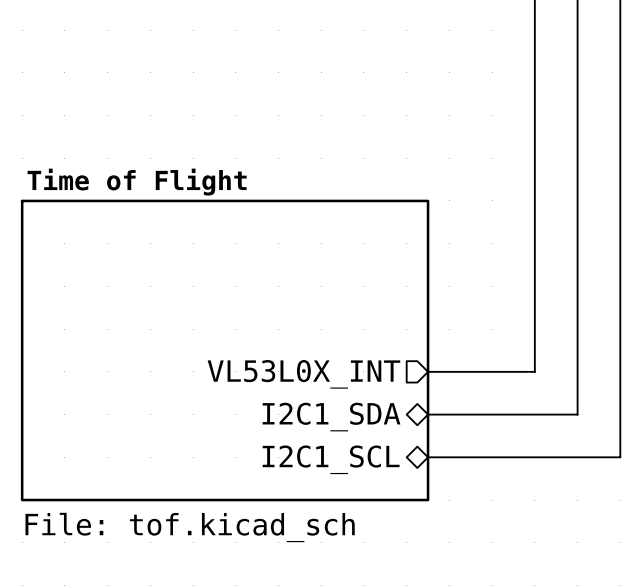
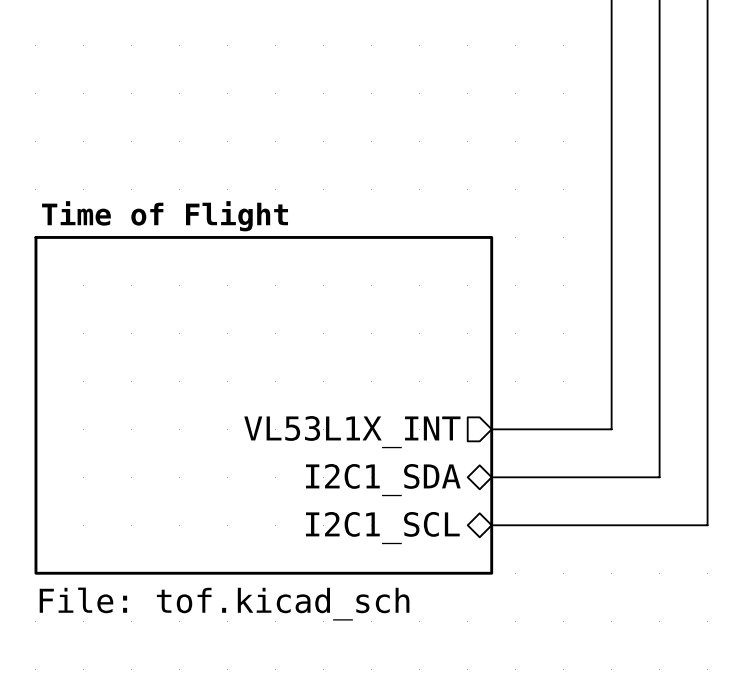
sheet pin: VL53L0X_INT (303, 374) -> VL53L1X_INT (352, 432)

